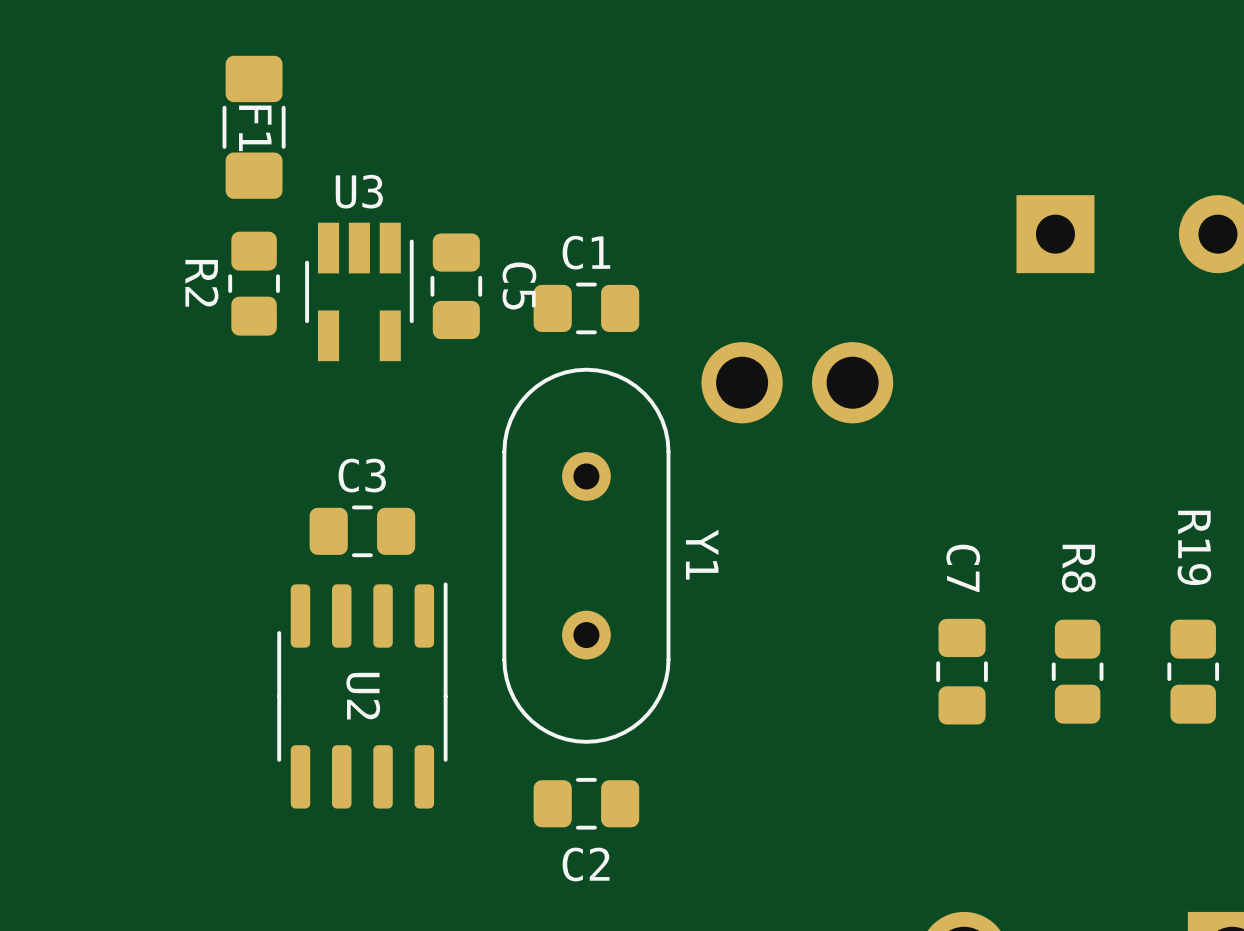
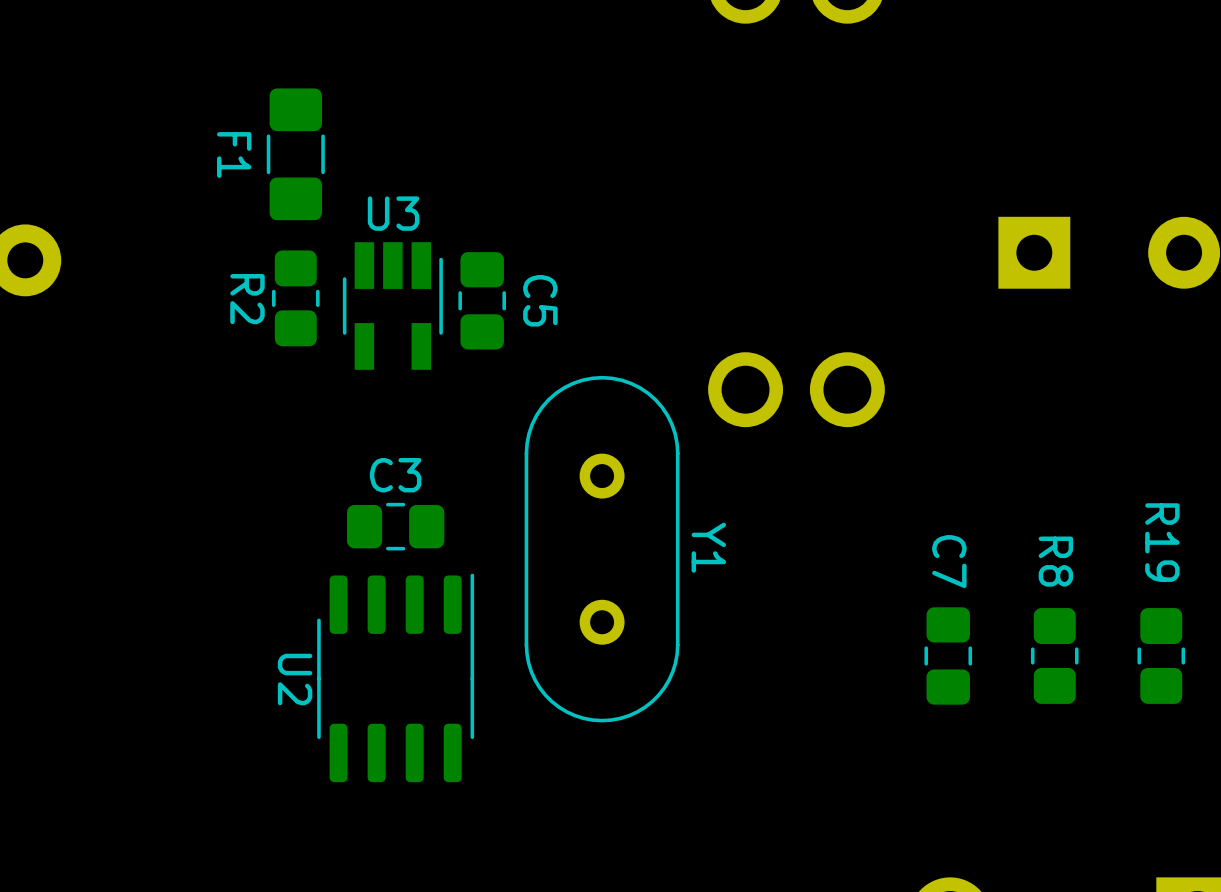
F1 name position: F1 (255, 128) -> F1 (234, 155)
C1: (586, 308) -> none
U2 name position: U2 (363, 696) -> U2 (295, 679)
C2: (586, 803) -> none

